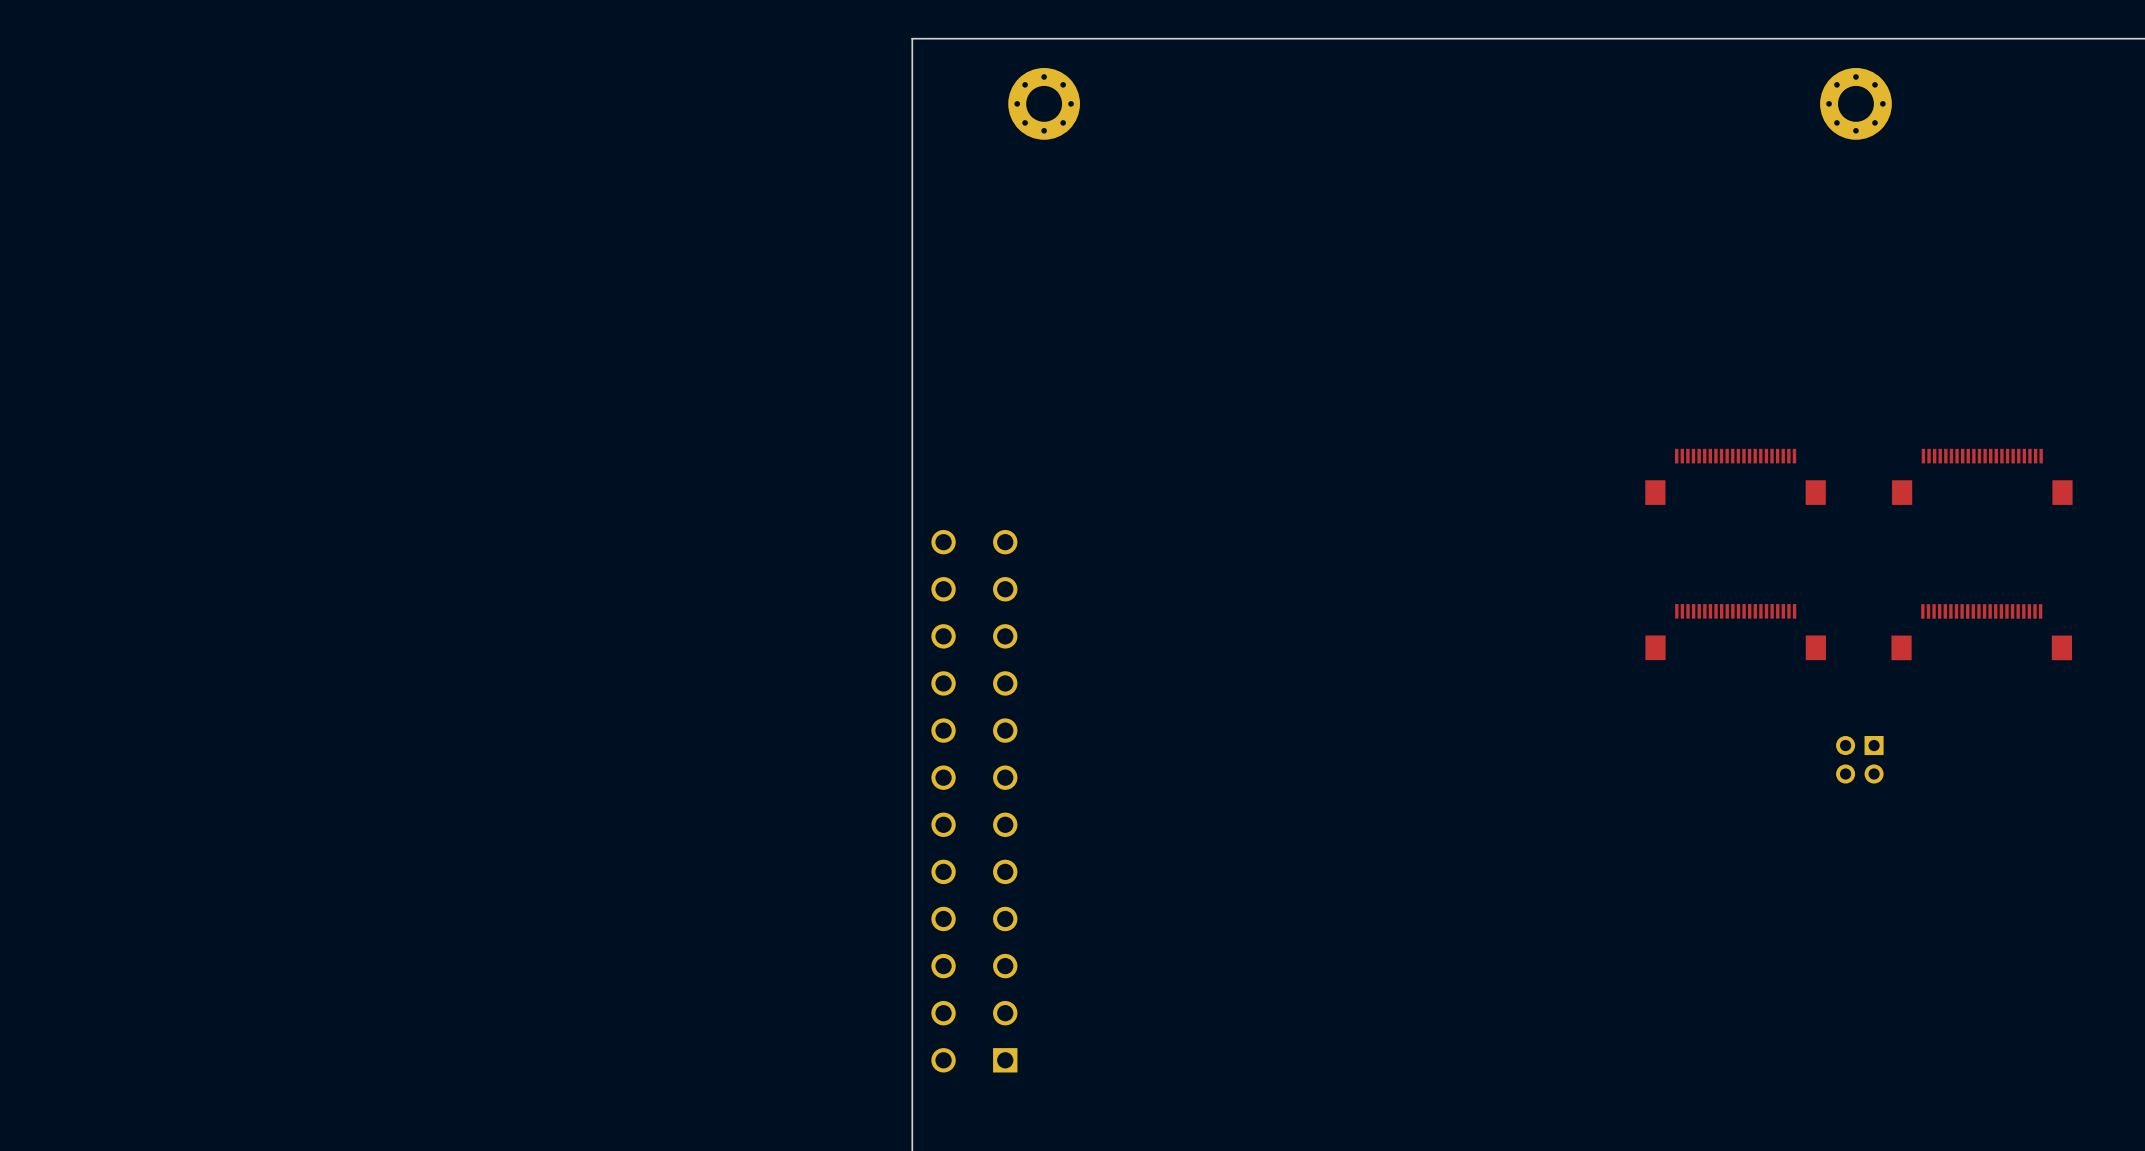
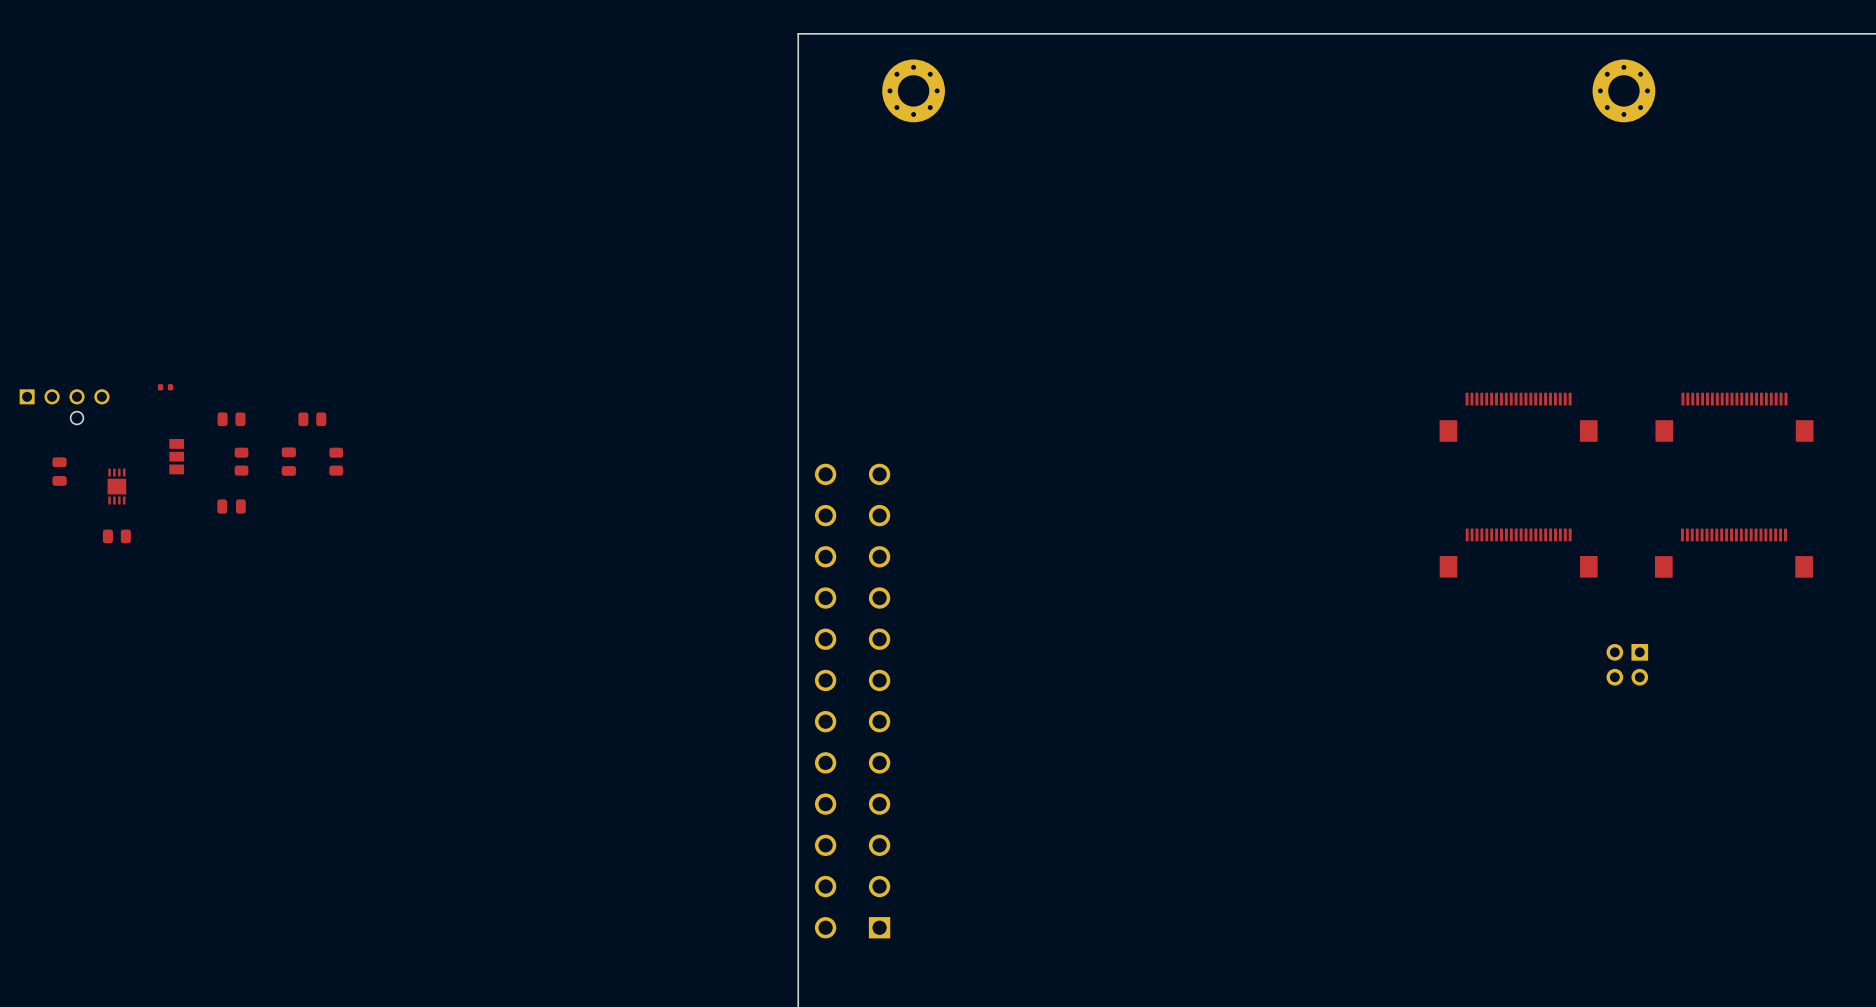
part: none -> (165, 387)
part: none -> (64, 406)
part: none -> (231, 419)
part: none -> (312, 419)
part: none -> (176, 456)
part: none -> (241, 461)
part: none -> (288, 461)
part: none -> (336, 461)
part: none -> (59, 471)
part: none -> (116, 486)
part: none -> (231, 506)
part: none -> (116, 536)

